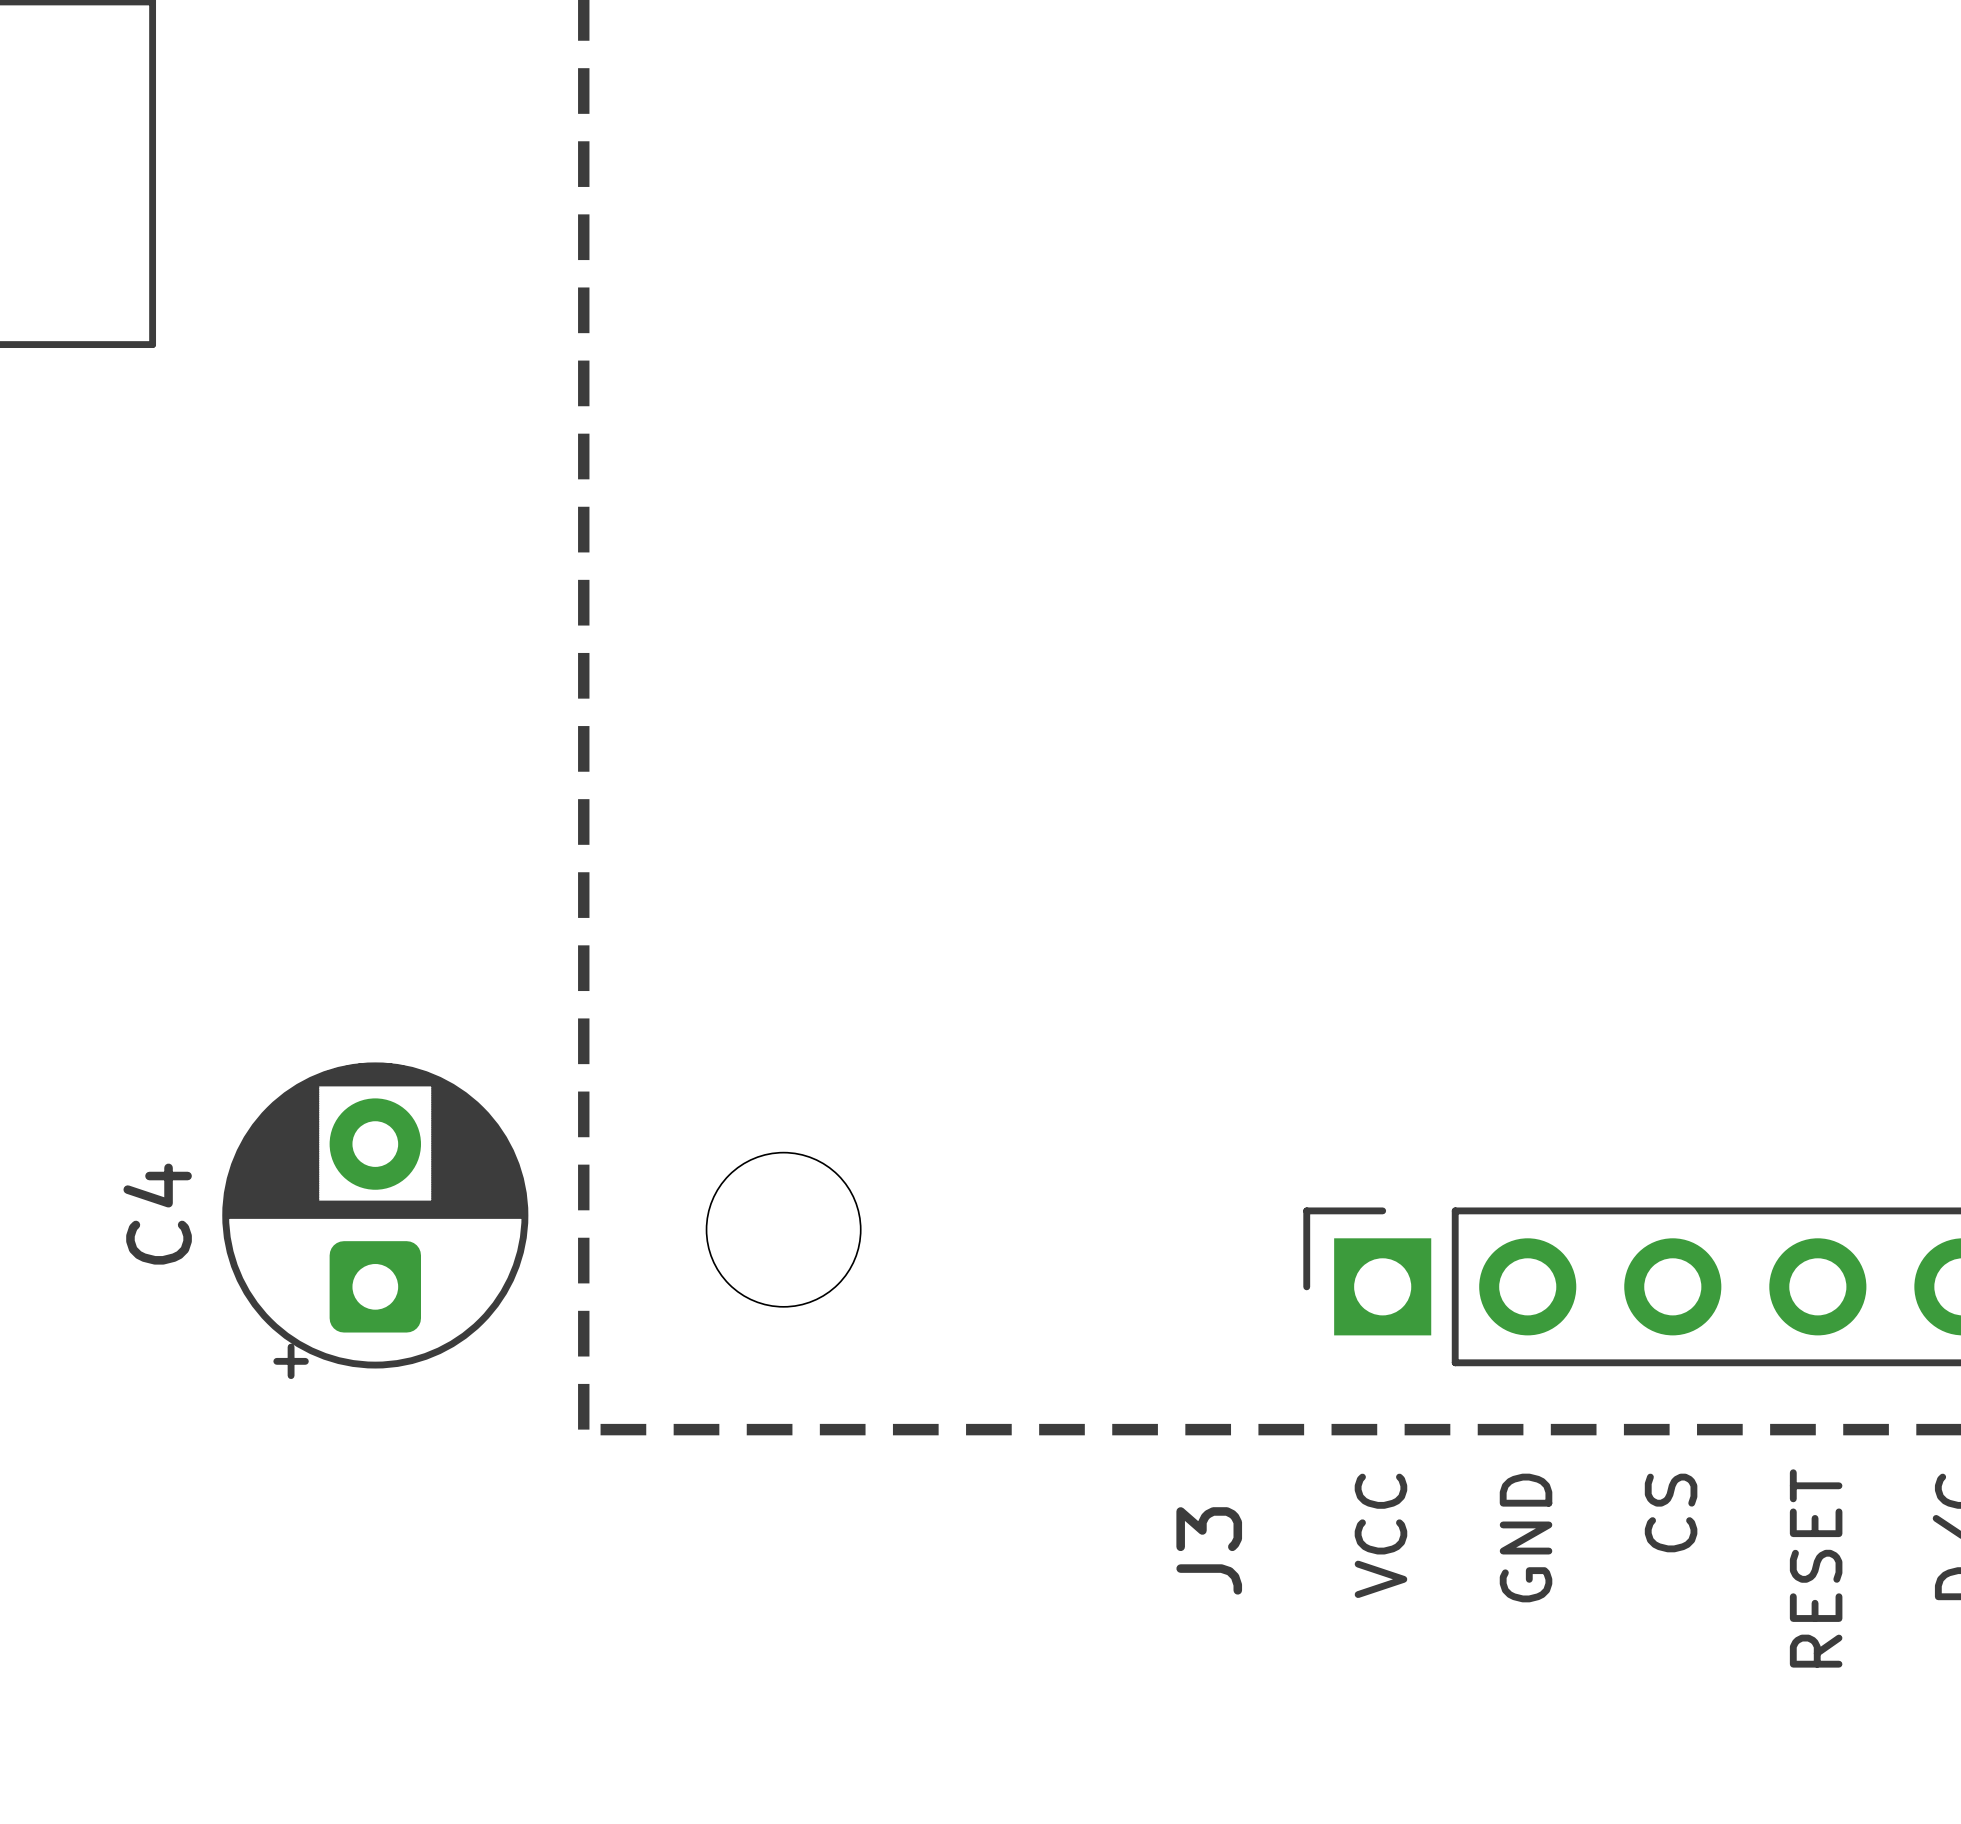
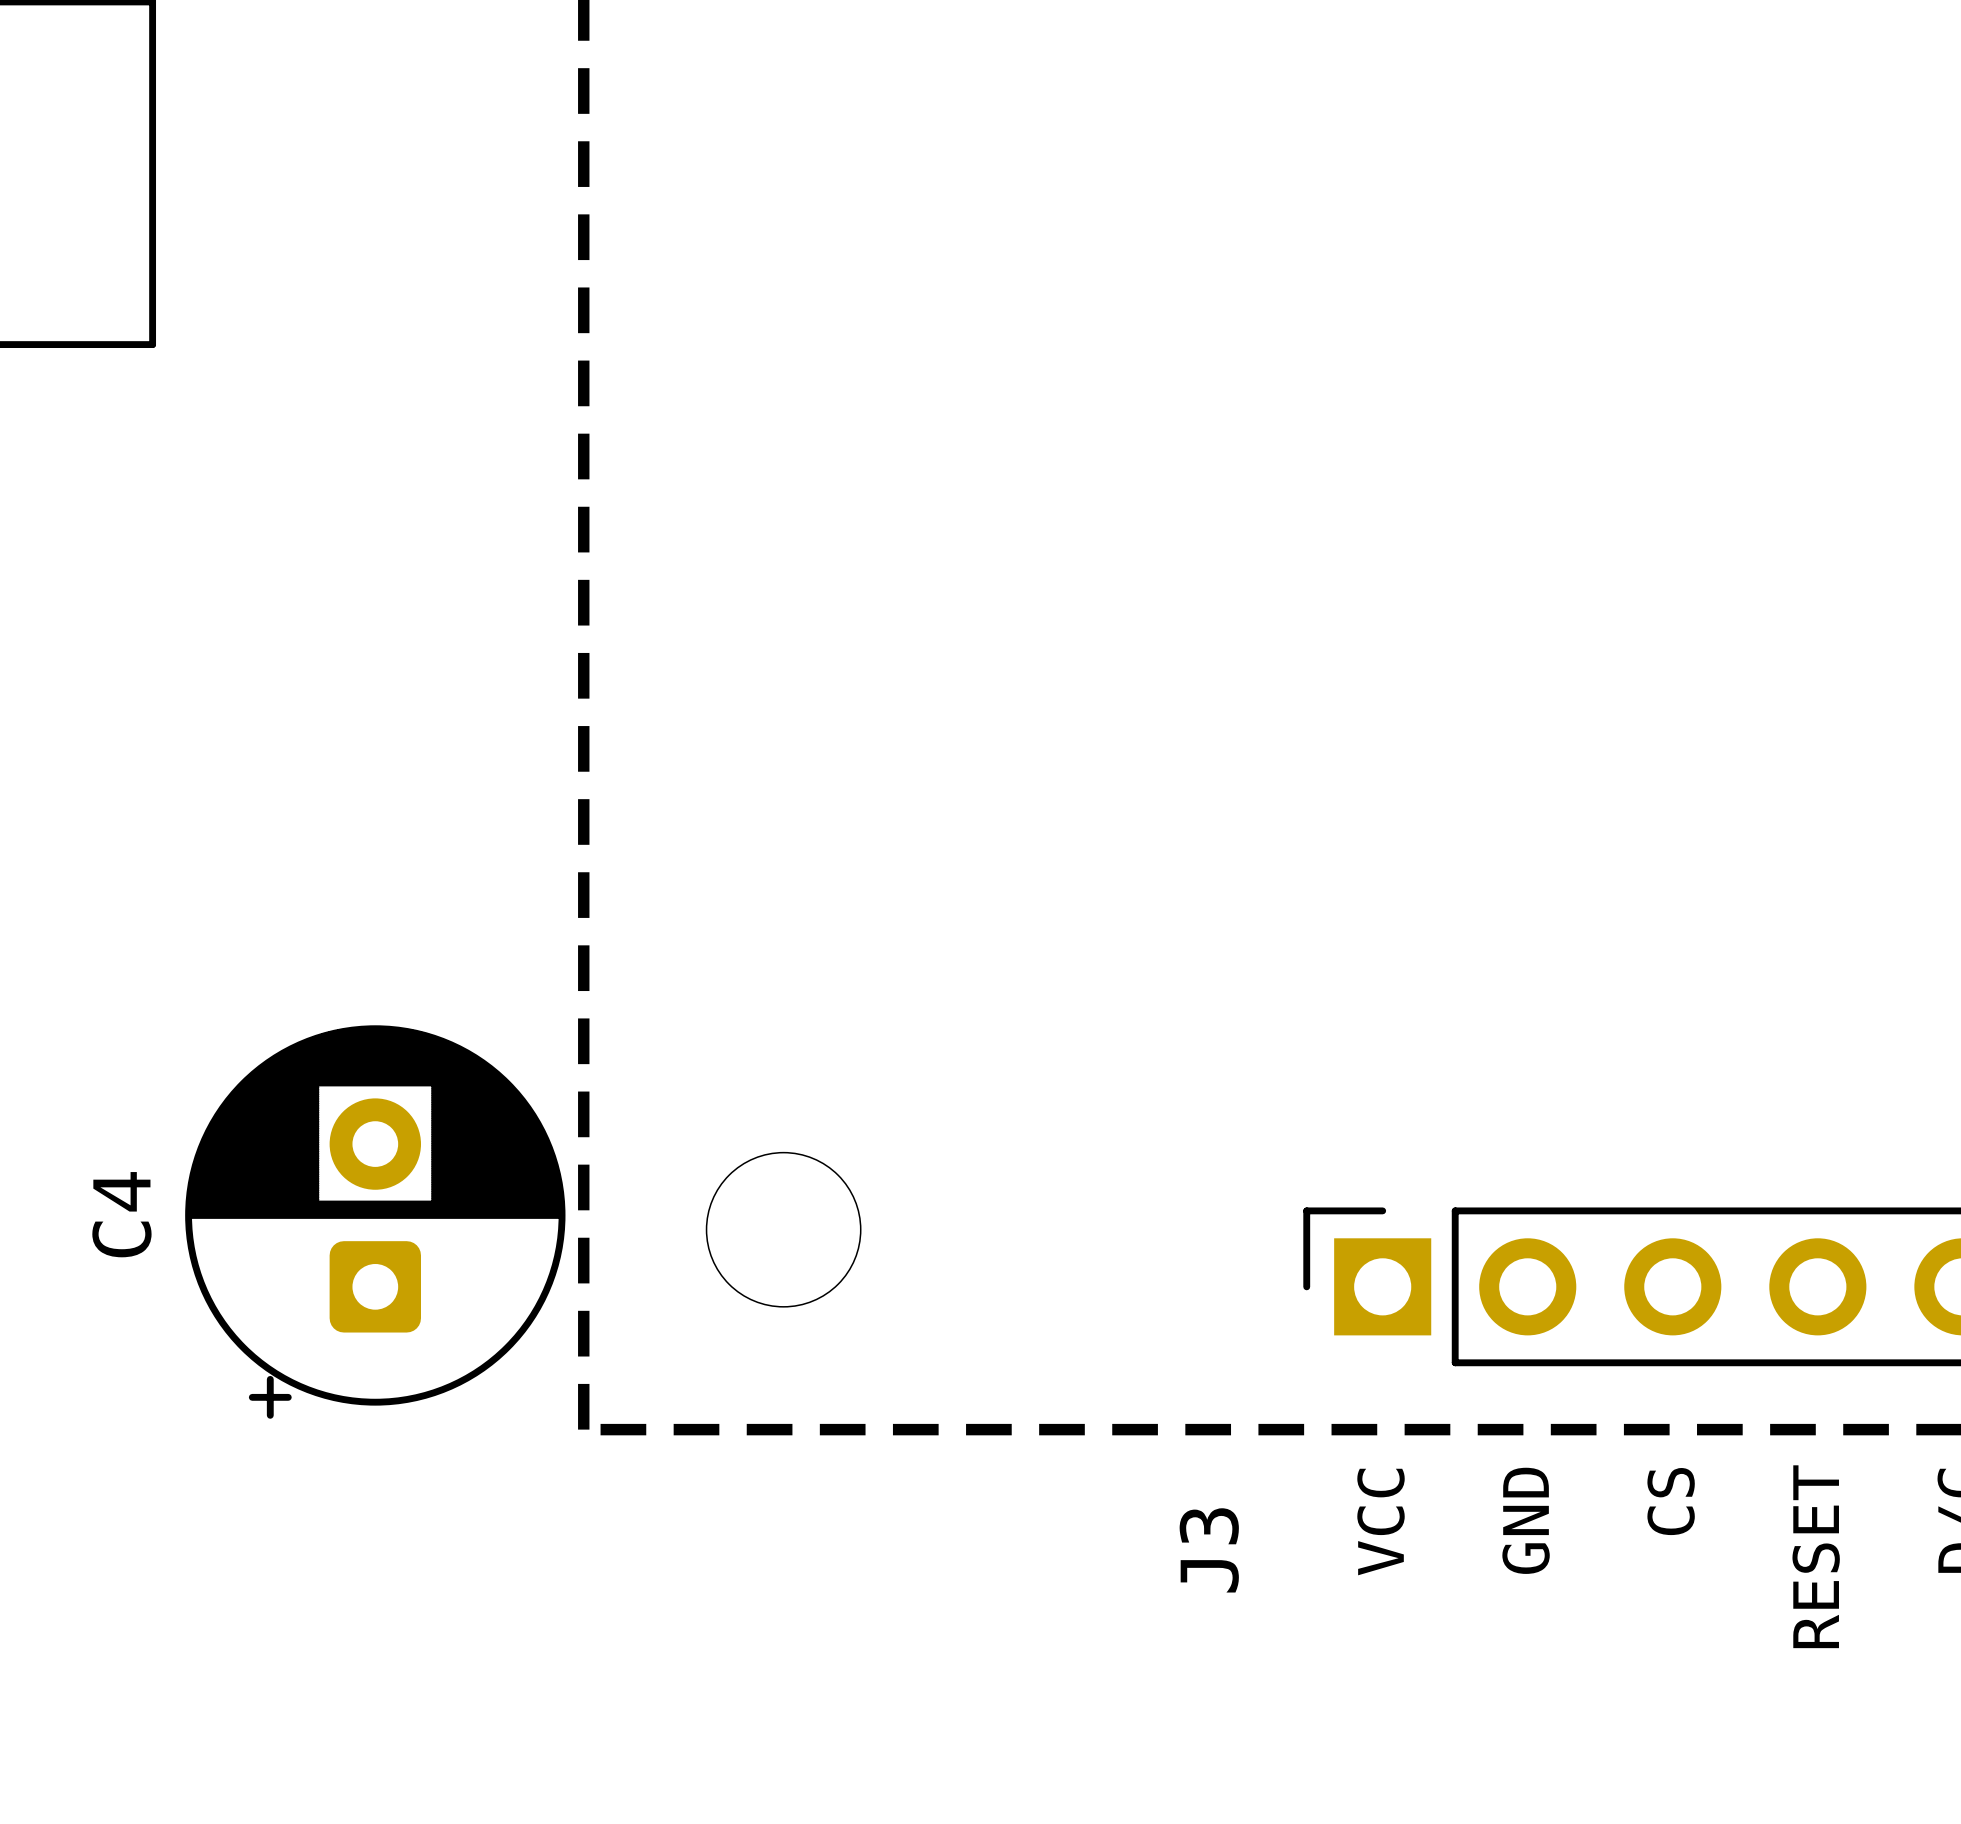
C4 footprint: [222, 1062, 529, 1380] -> [185, 1025, 566, 1419]
C4 name position: C4 (157, 1214) -> C4 (121, 1214)

